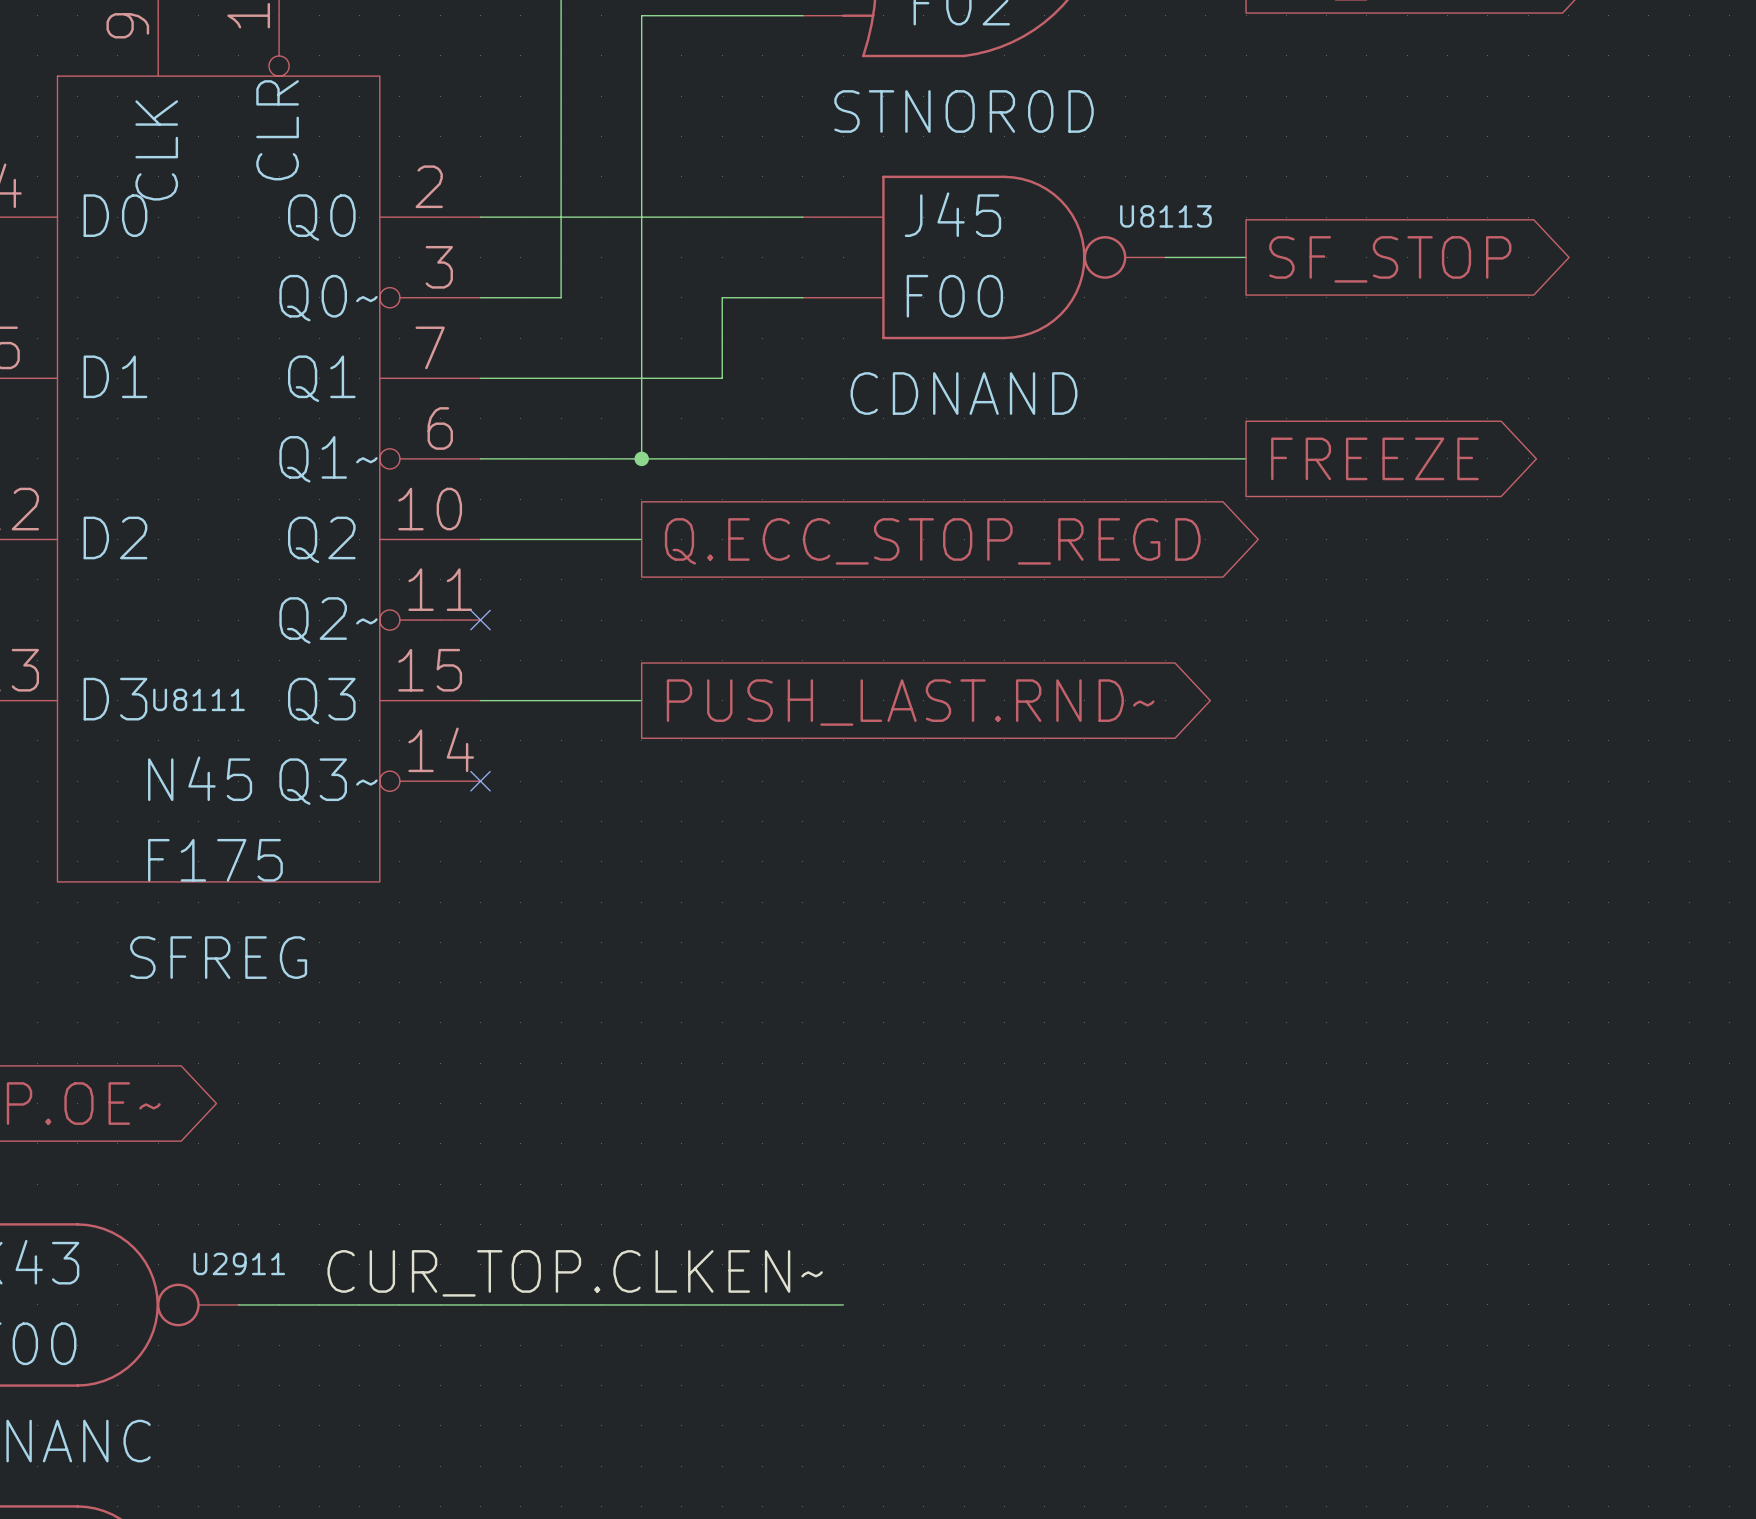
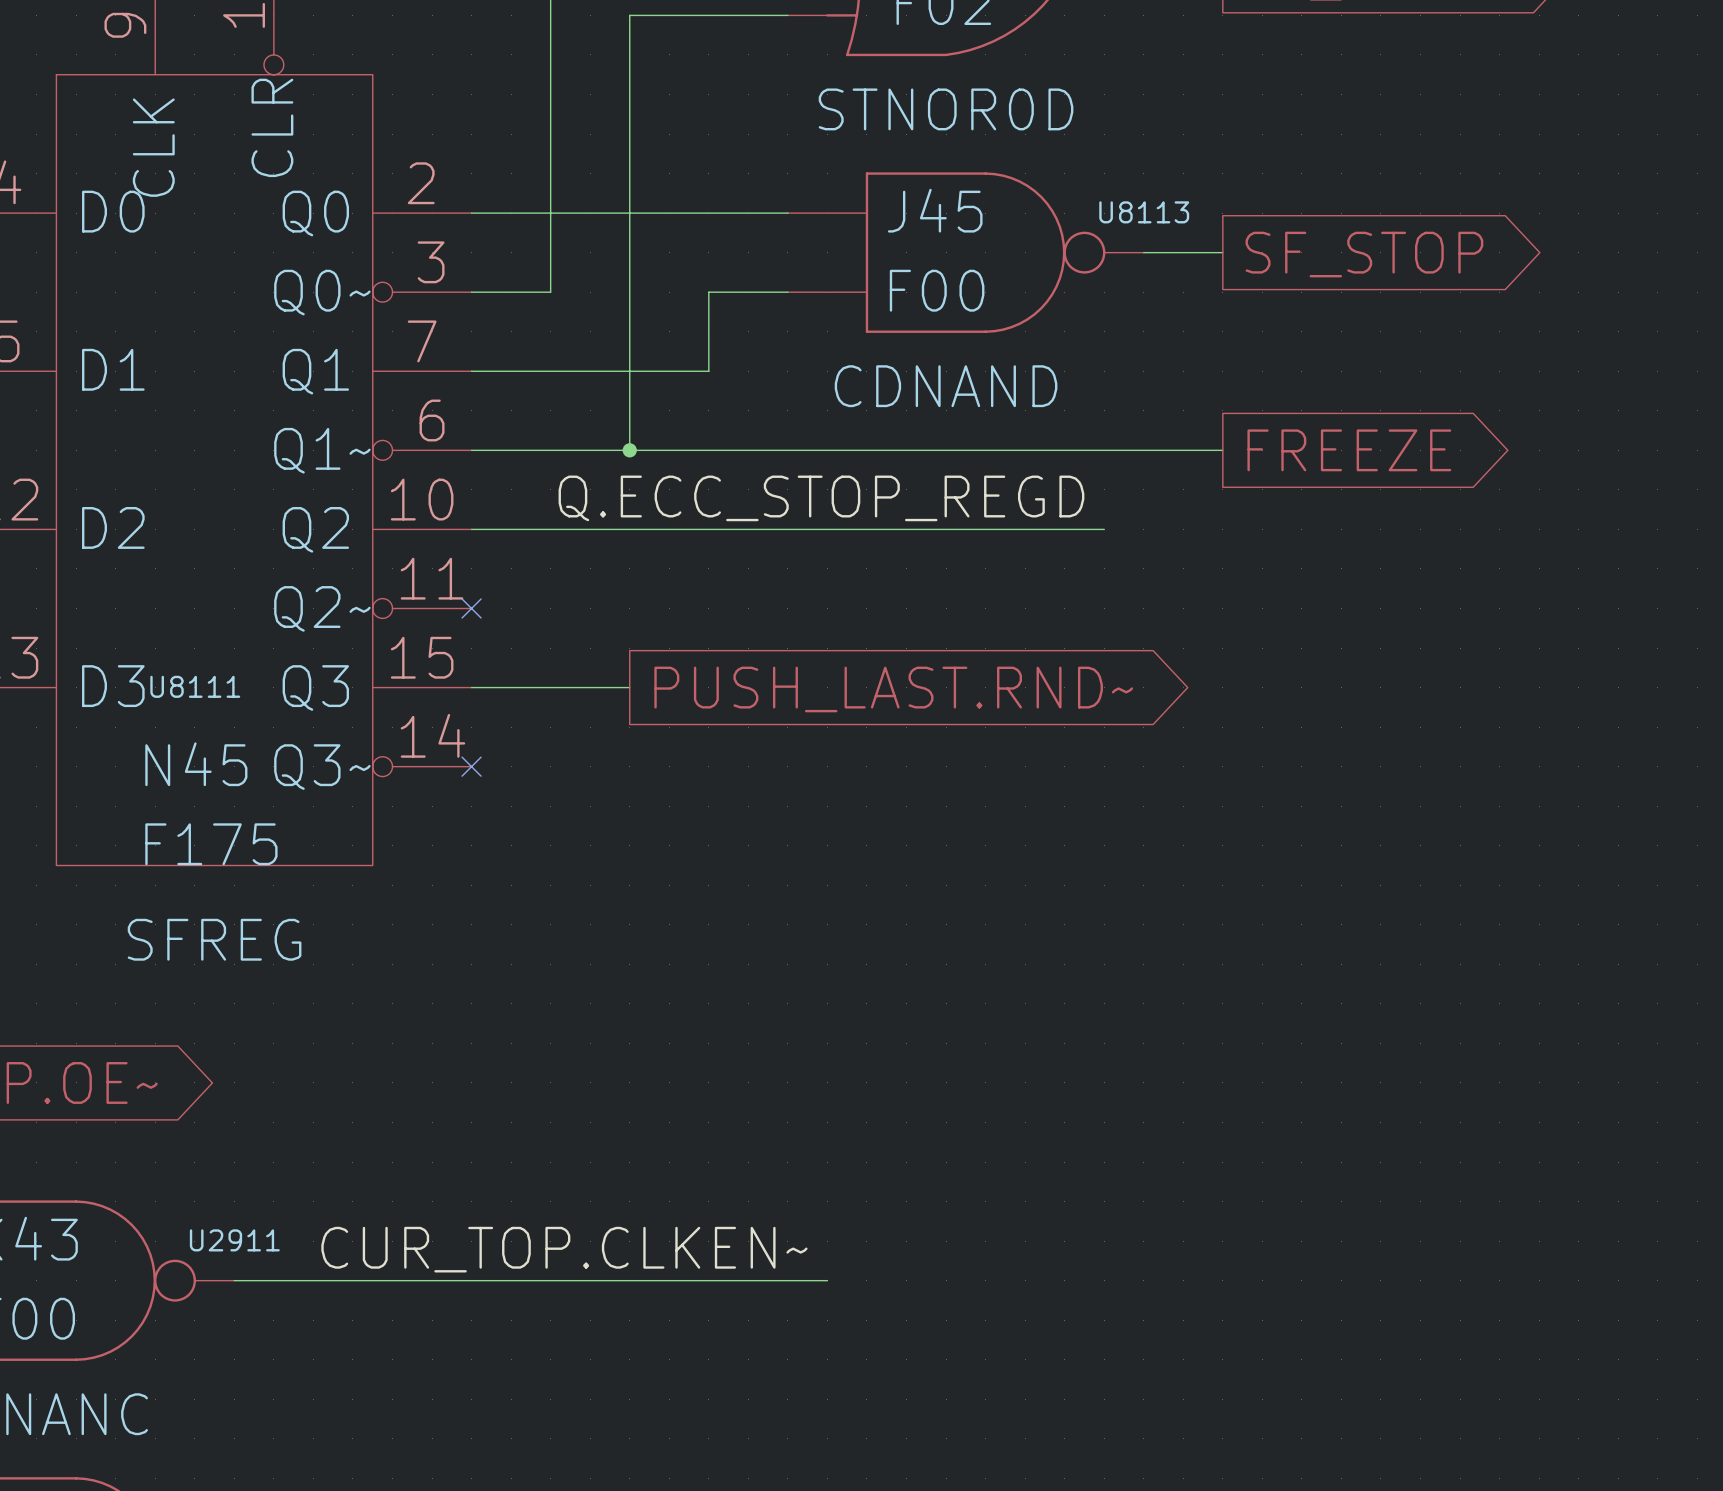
label: none -> Q.ECC_STOP_REGD (821, 498)
wire: none -> (629, 529) (1104, 529)
global label: Q.ECC_STOP_REGD (932, 541) -> none

